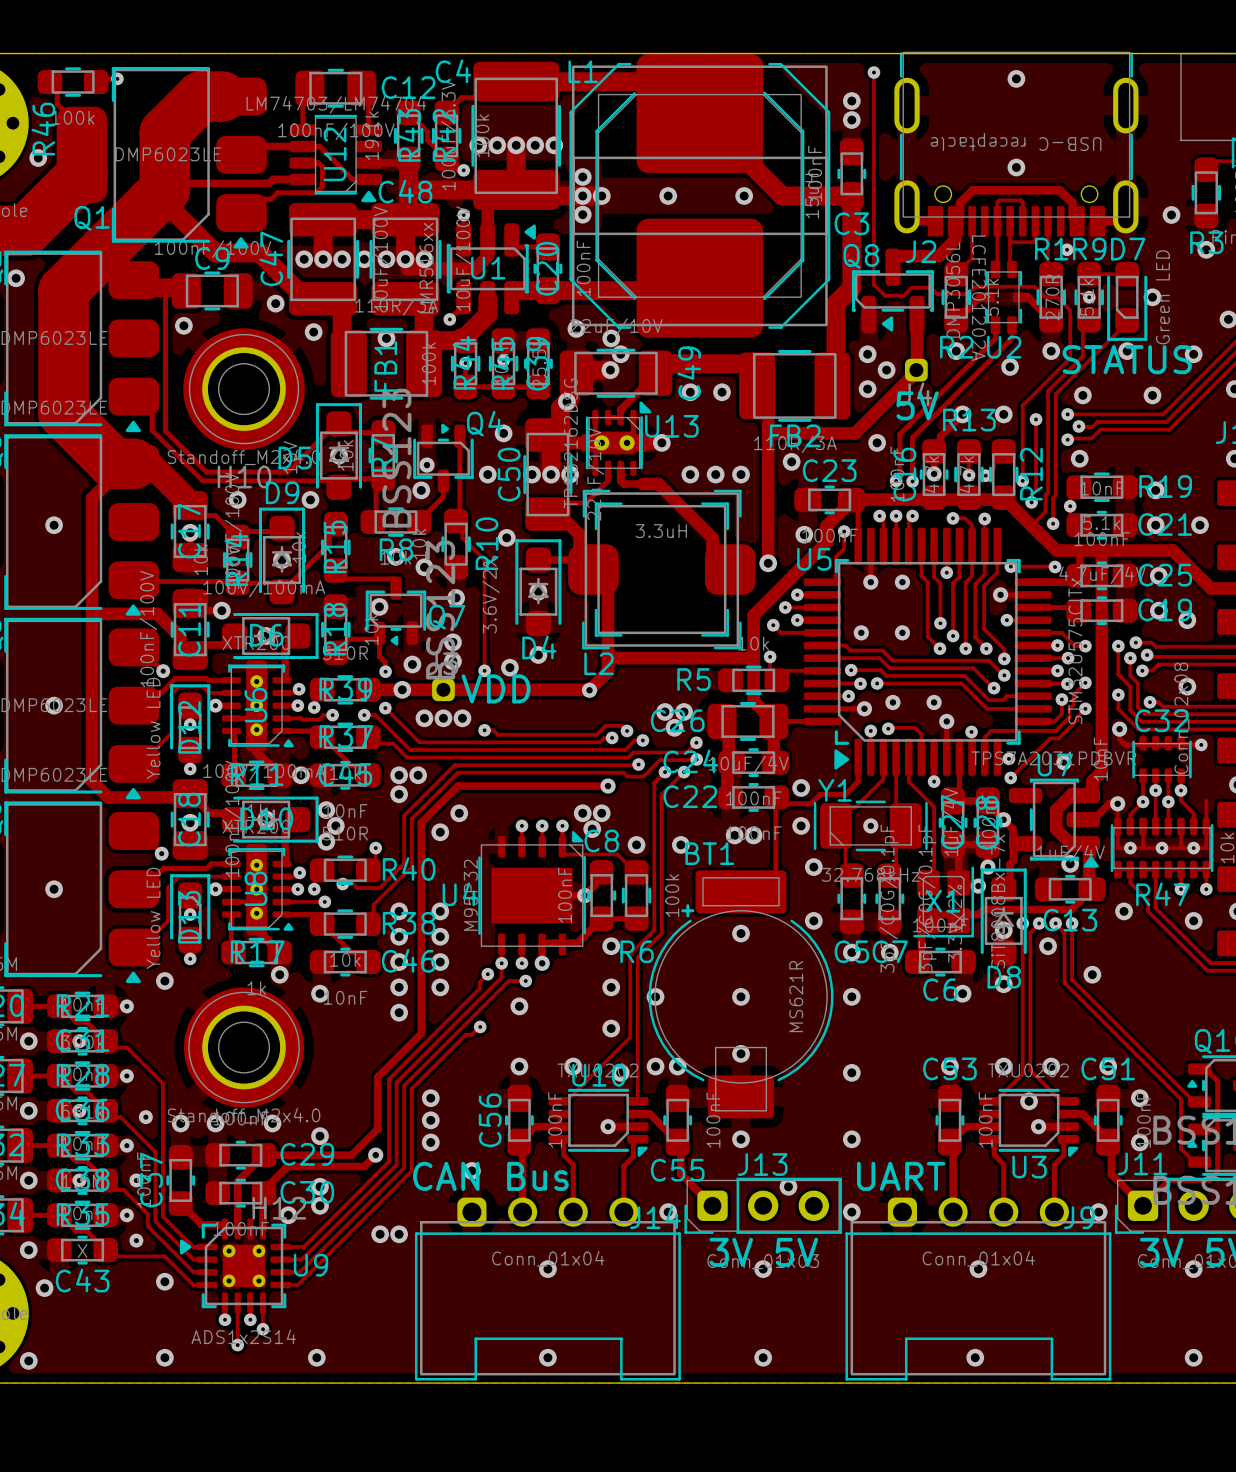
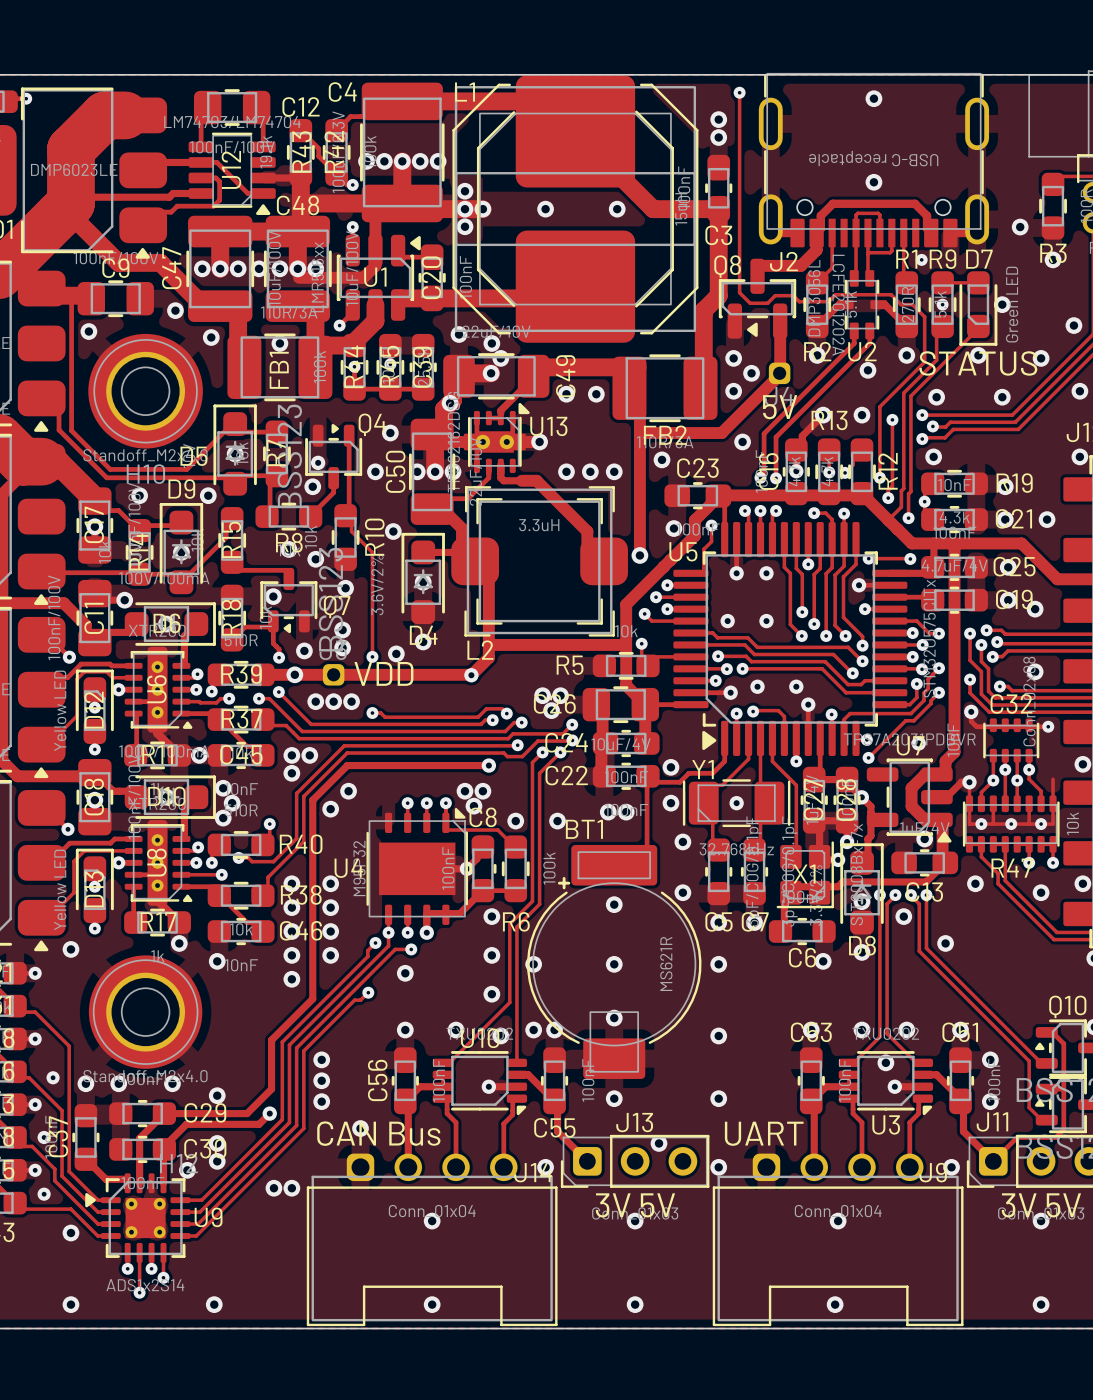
R19 value: 5.1k (1101, 522) -> 4.3k (954, 517)

